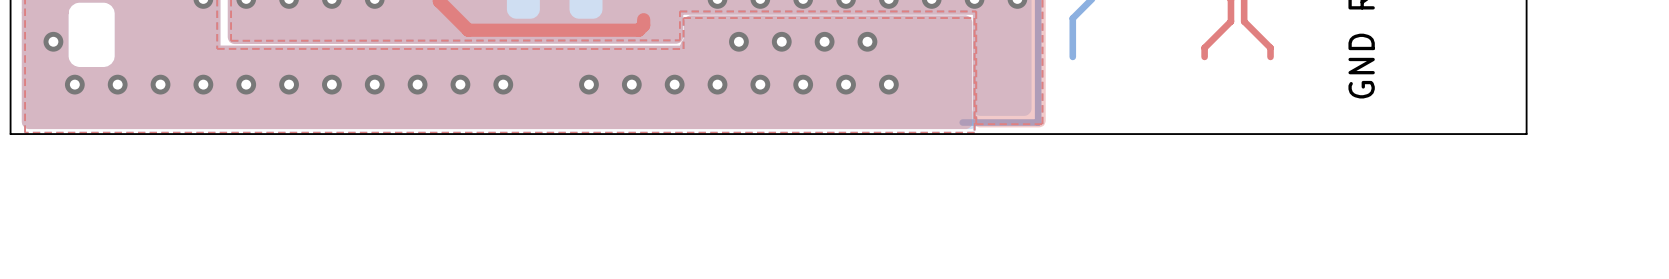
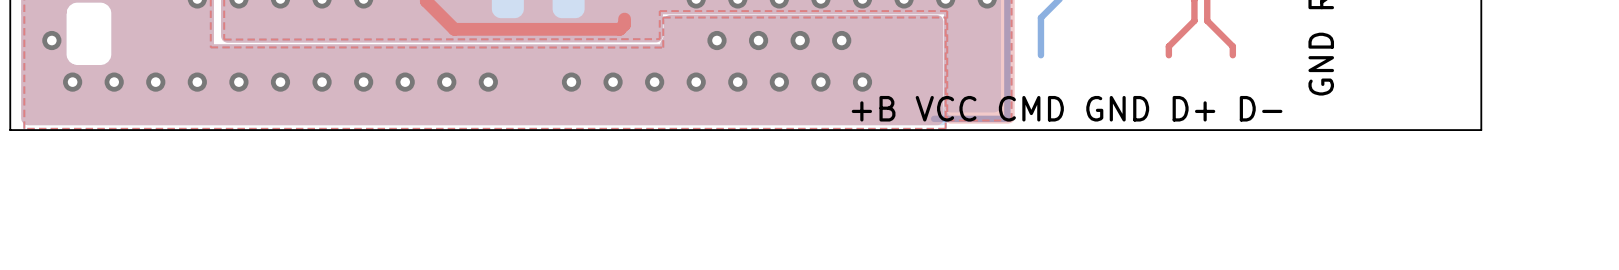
text: none -> +B VCC CMD GND D+ D- (1067, 108)

